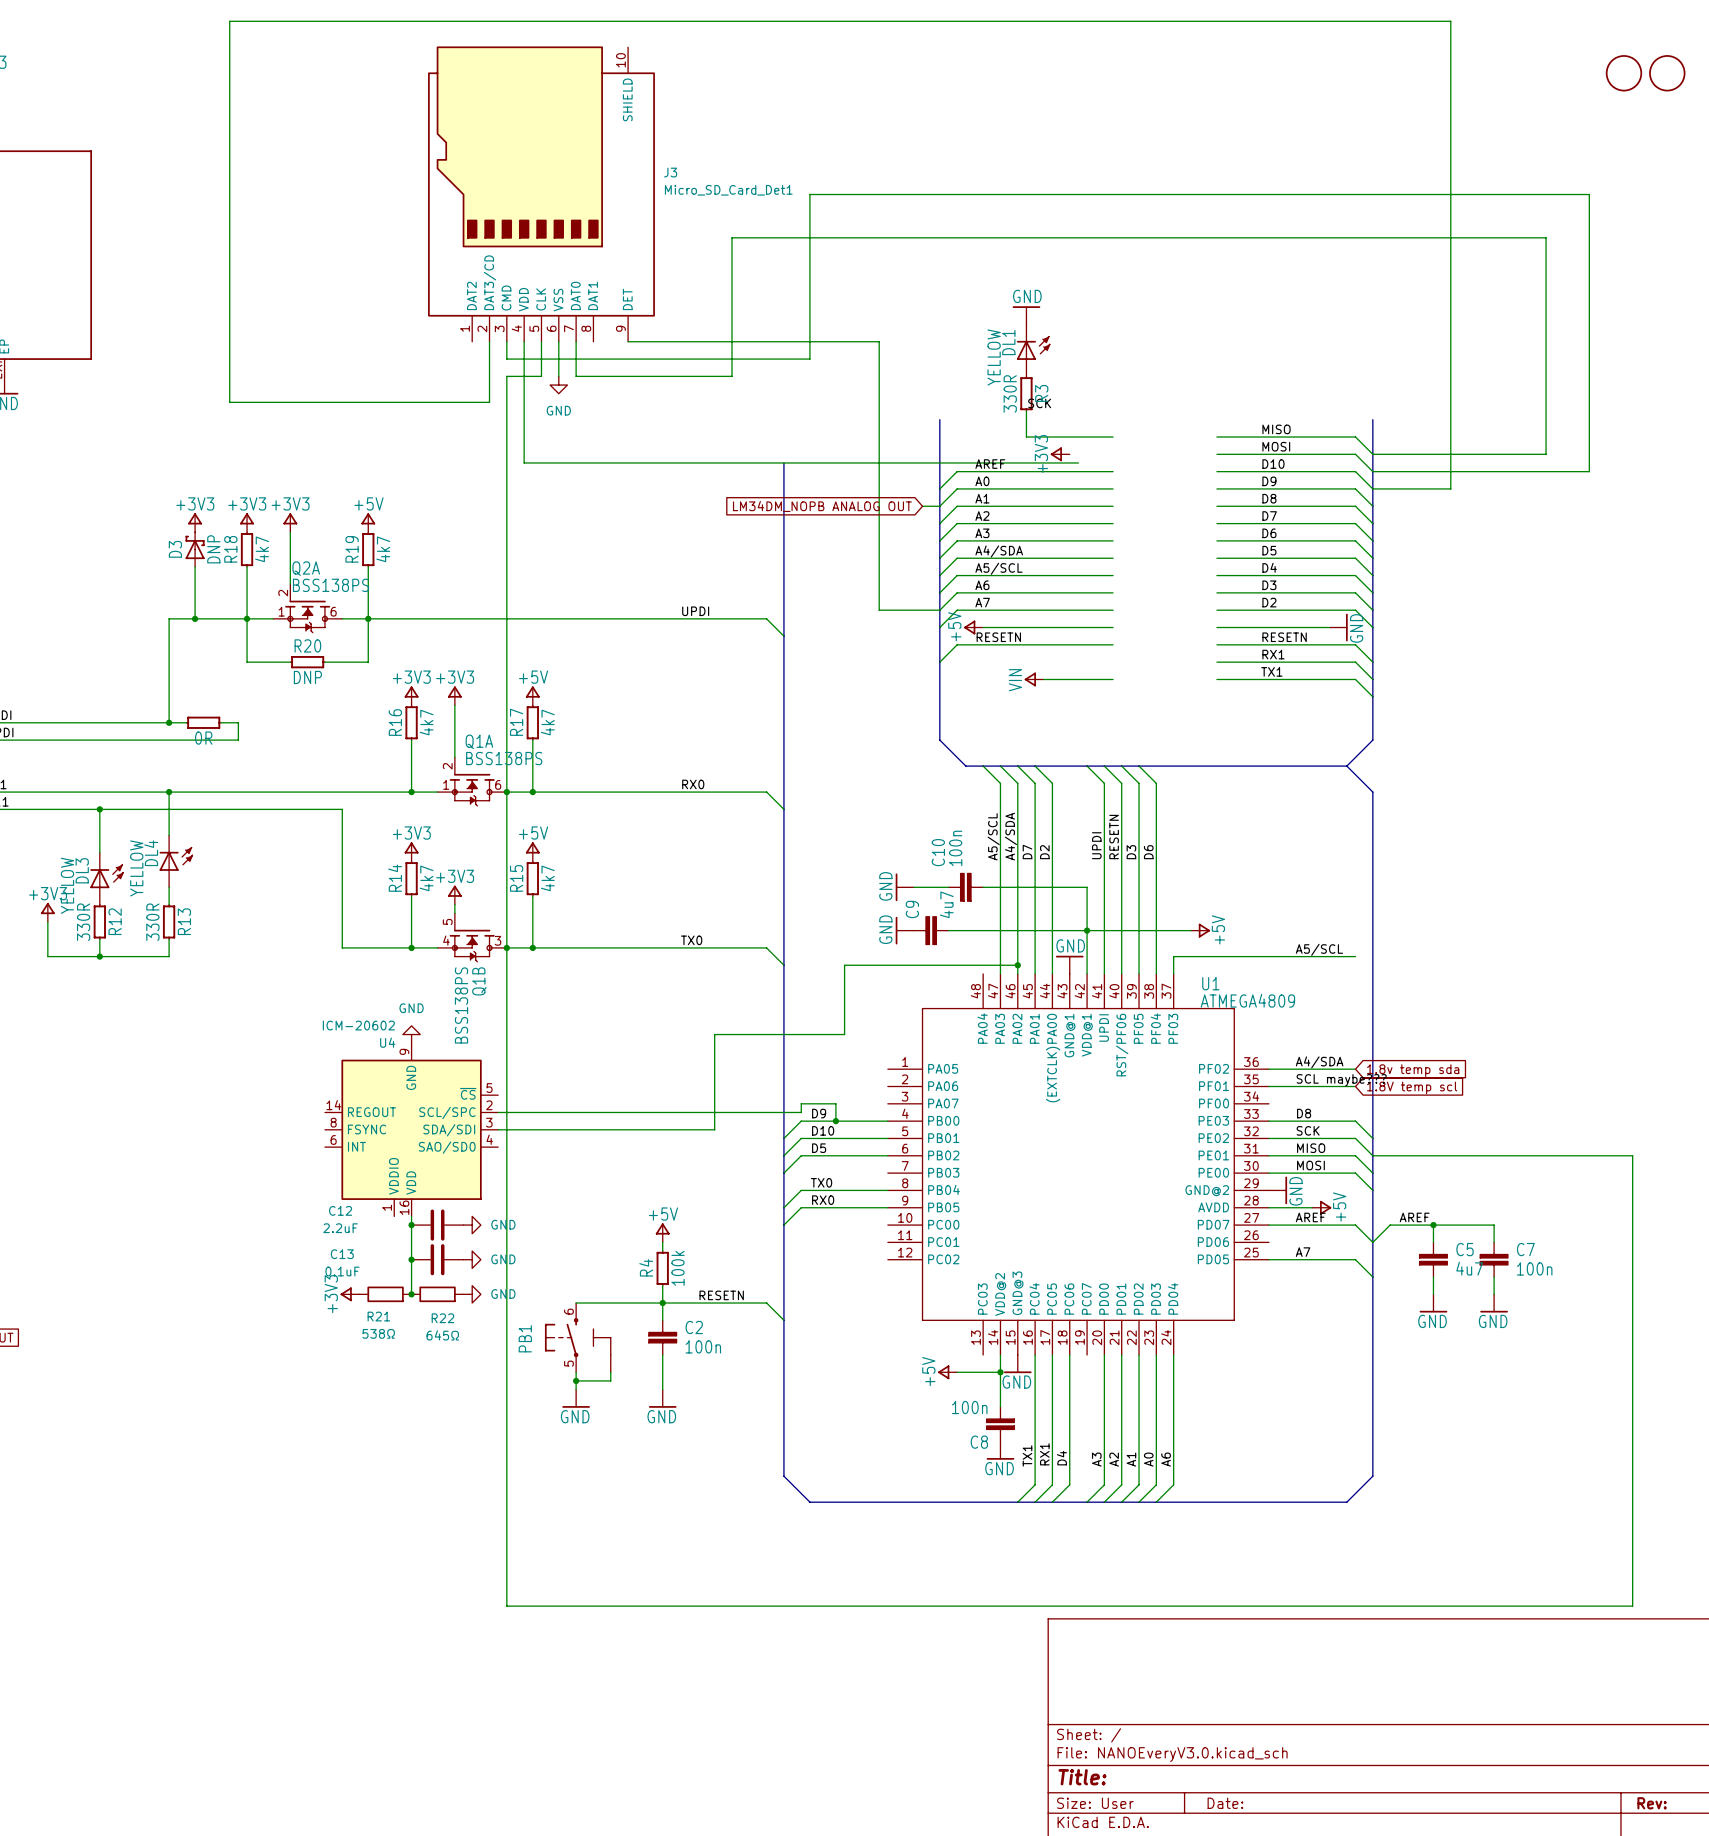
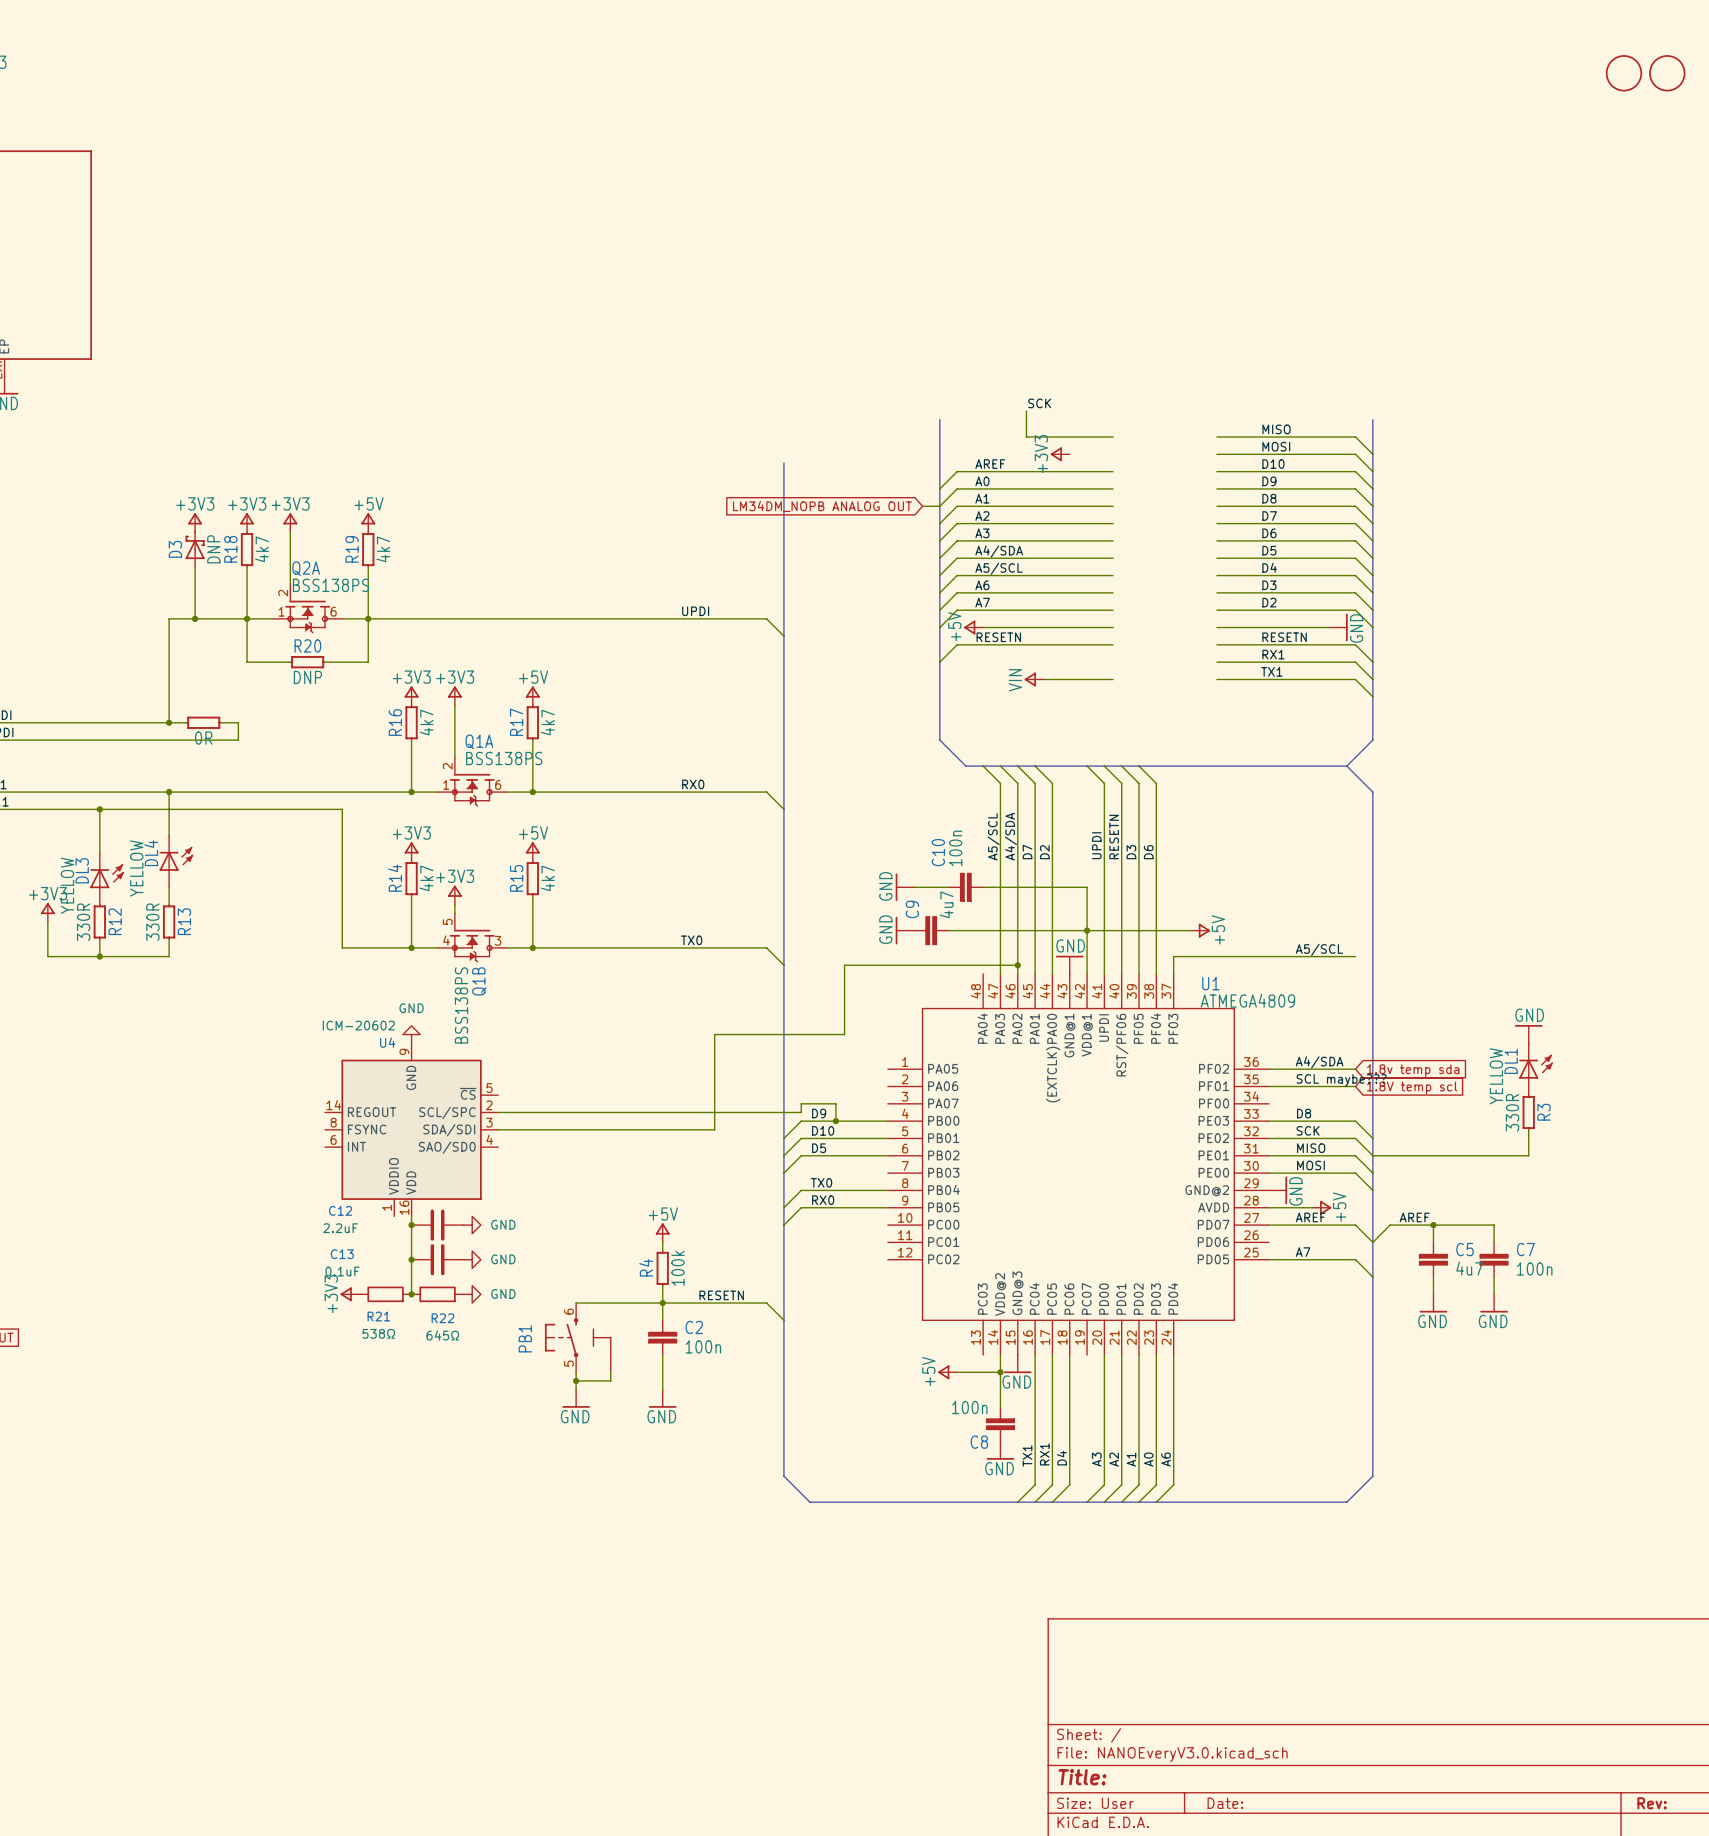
J3: Micro_SD_Card_Det1 (541, 194) -> none
power symbol: GND (1026, 315) -> none
wire: (489, 341) (489, 402) (229, 402) (229, 21) (1450, 21) (1450, 488) (1372, 488) -> none
wire: (506, 341) (506, 359) (809, 359) (809, 194) (1589, 194) (1589, 471) (1372, 471) -> none
wire: (524, 341) (524, 462) (1078, 462) -> none
wire: (541, 341) (541, 376) (506, 376) (506, 1606) (1632, 1606) (1632, 1155) (1528, 1155) -> (1528, 1129) (1528, 1155)
wire: (558, 341) (558, 376) -> none
wire: (576, 341) (576, 376) (731, 376) (731, 237) (1546, 237) (1546, 454) (1372, 454) -> none
wire: (628, 341) (879, 341) (879, 610) (939, 610) -> none
DL1 position: (1033, 350) -> (1535, 1069)
power symbol: GND (558, 385) -> none
R3 position: (1026, 393) -> (1528, 1112)
junction: (506, 792) -> none
junction: (506, 947) -> none
power symbol: none -> GND (1528, 1034)

